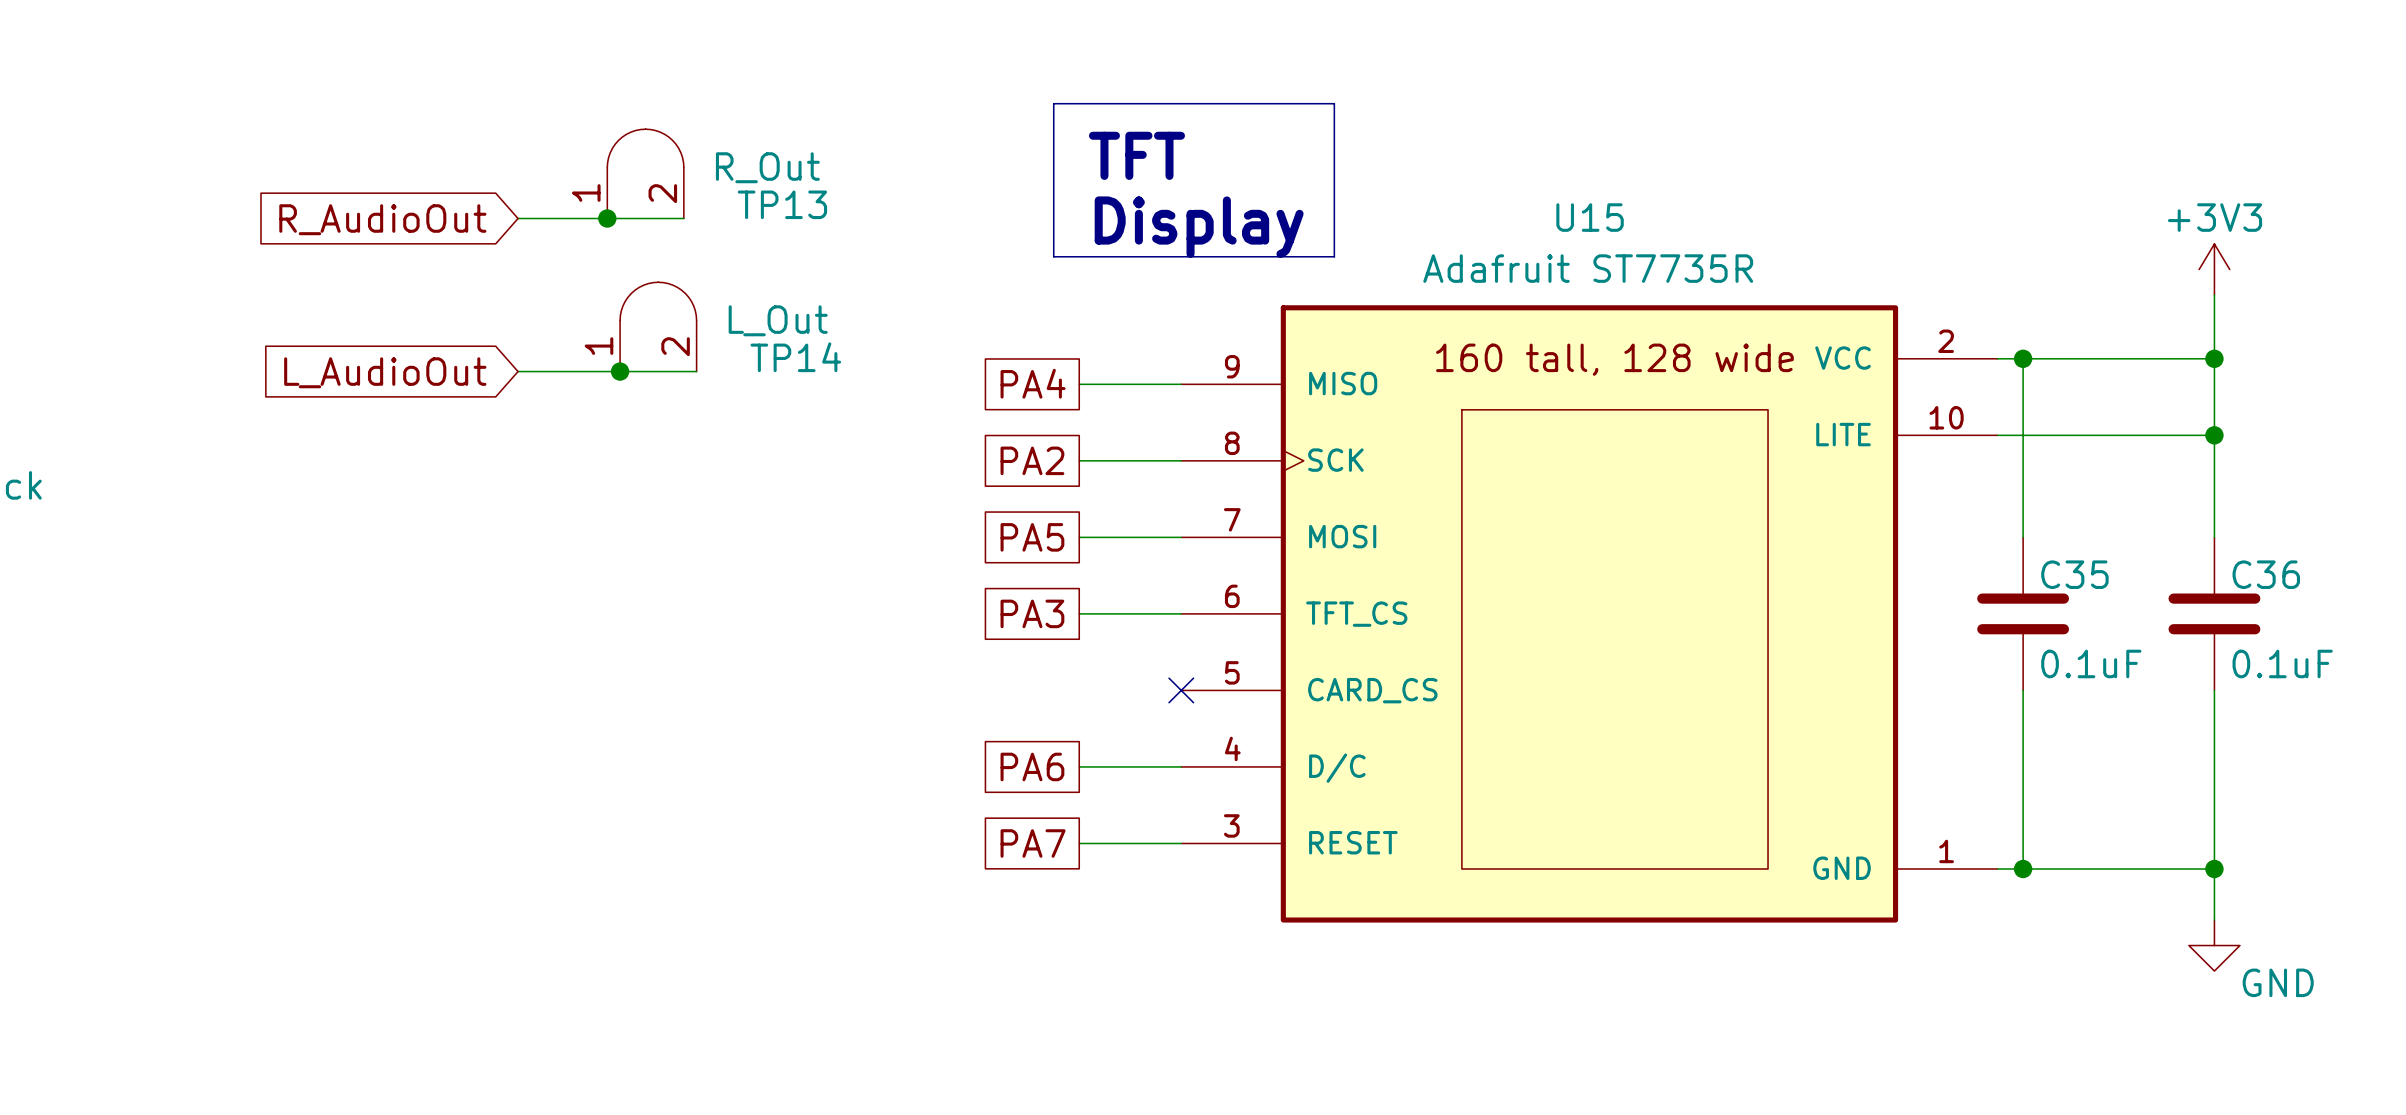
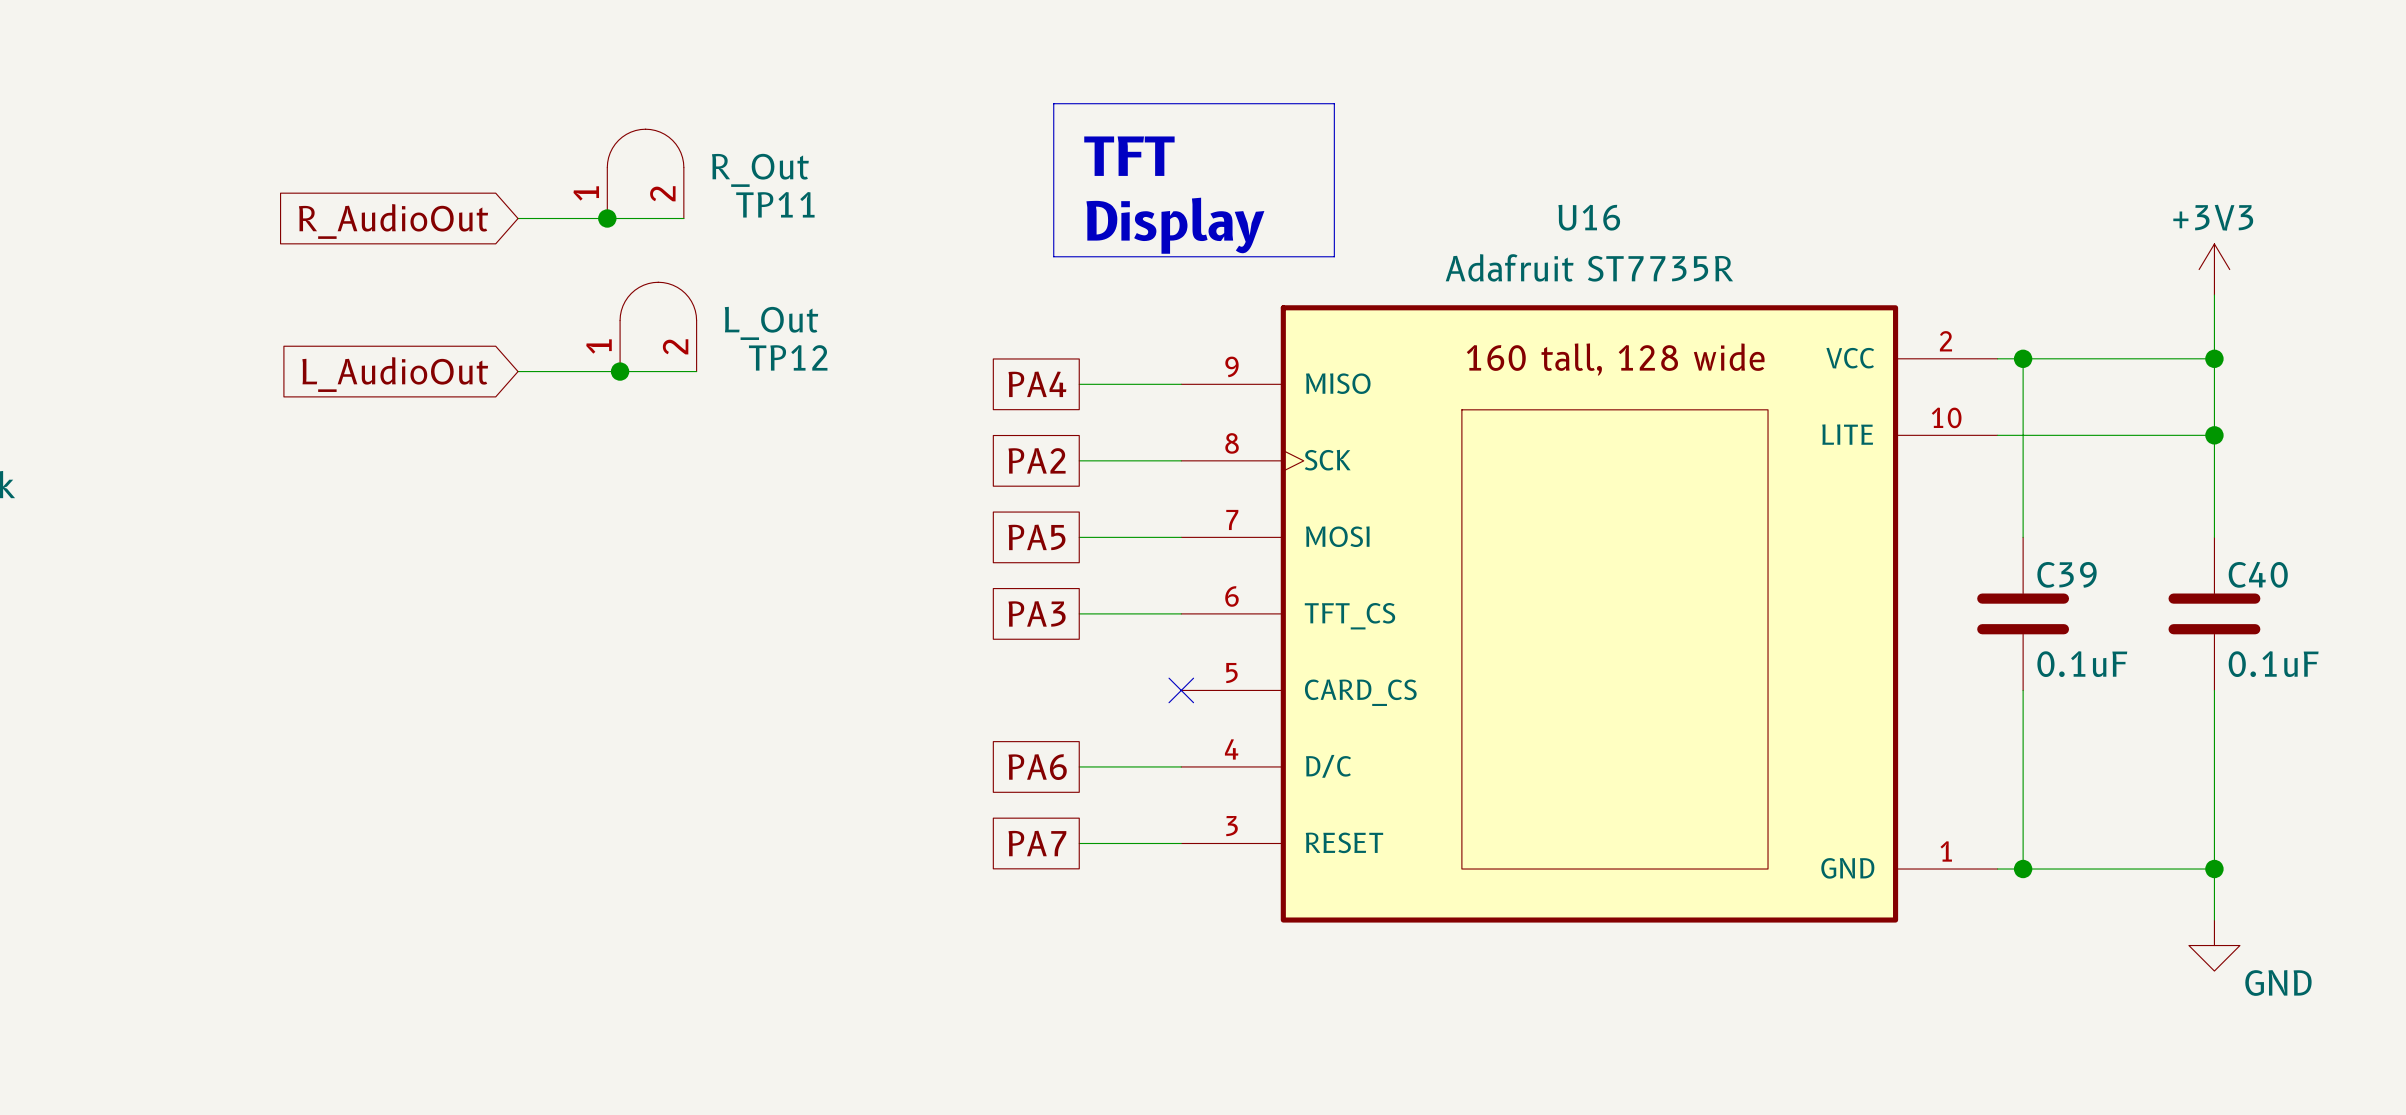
TP13 name: TP13 (782, 204) -> TP11 (775, 204)
U15 name: U15 (1590, 217) -> U16 (1589, 217)
TP14 name: TP14 (795, 357) -> TP12 (788, 357)
C35 name: C35 (2074, 574) -> C39 (2067, 574)
C36 name: C36 (2266, 574) -> C40 (2258, 574)

